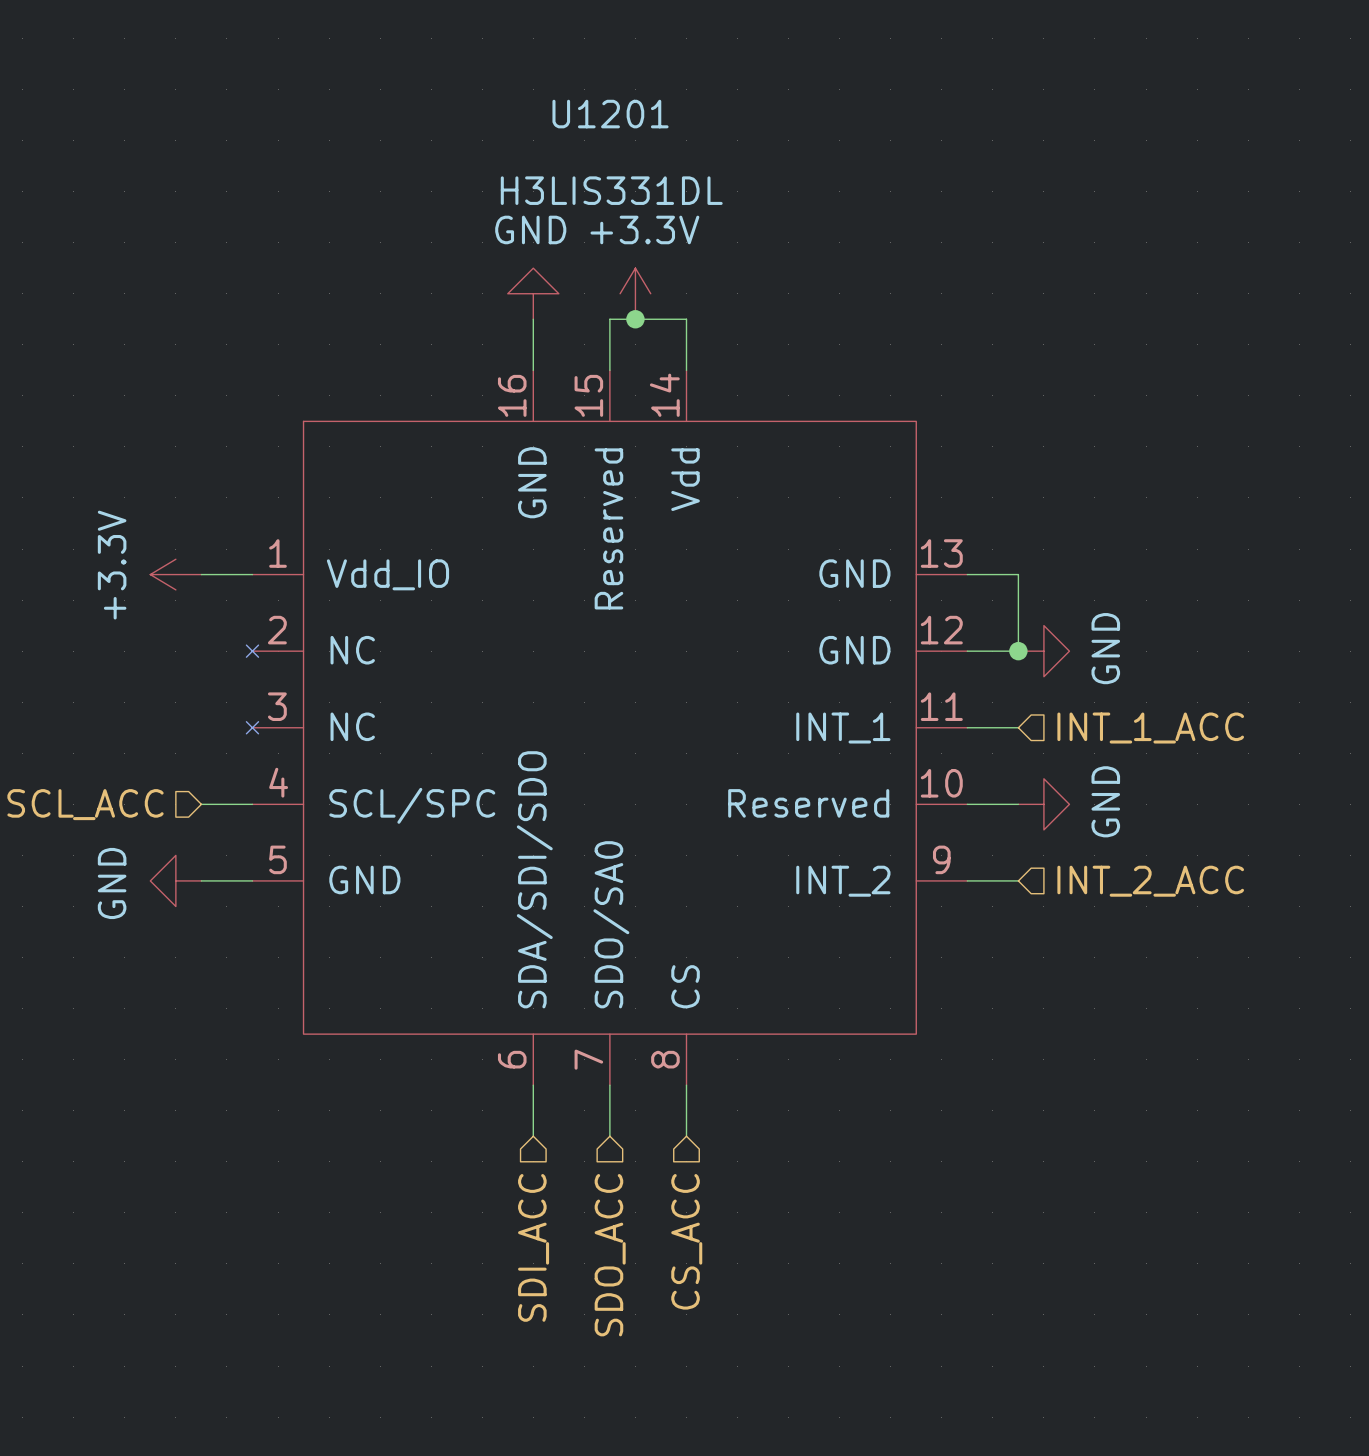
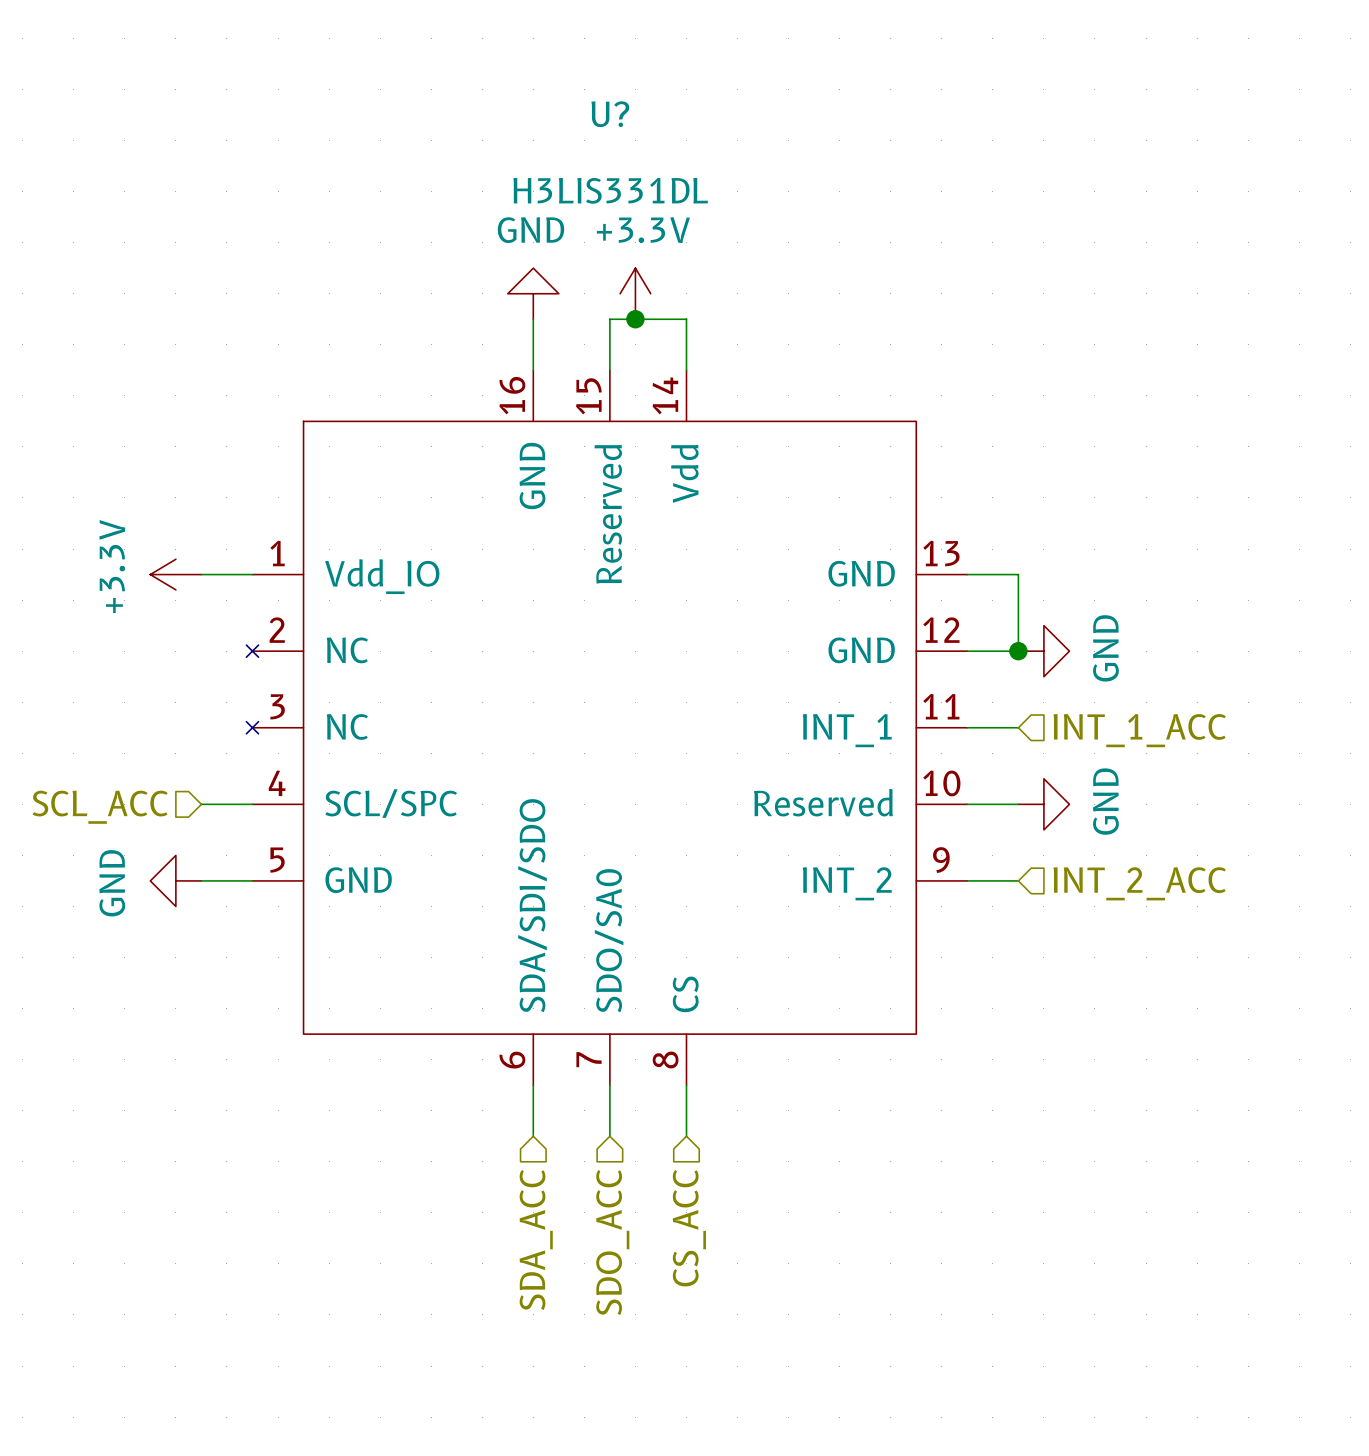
U1201 name: U1201 (610, 114) -> U? (610, 114)
hierarchical label: SDI_ACC (533, 1247) -> SDA_ACC (536, 1240)

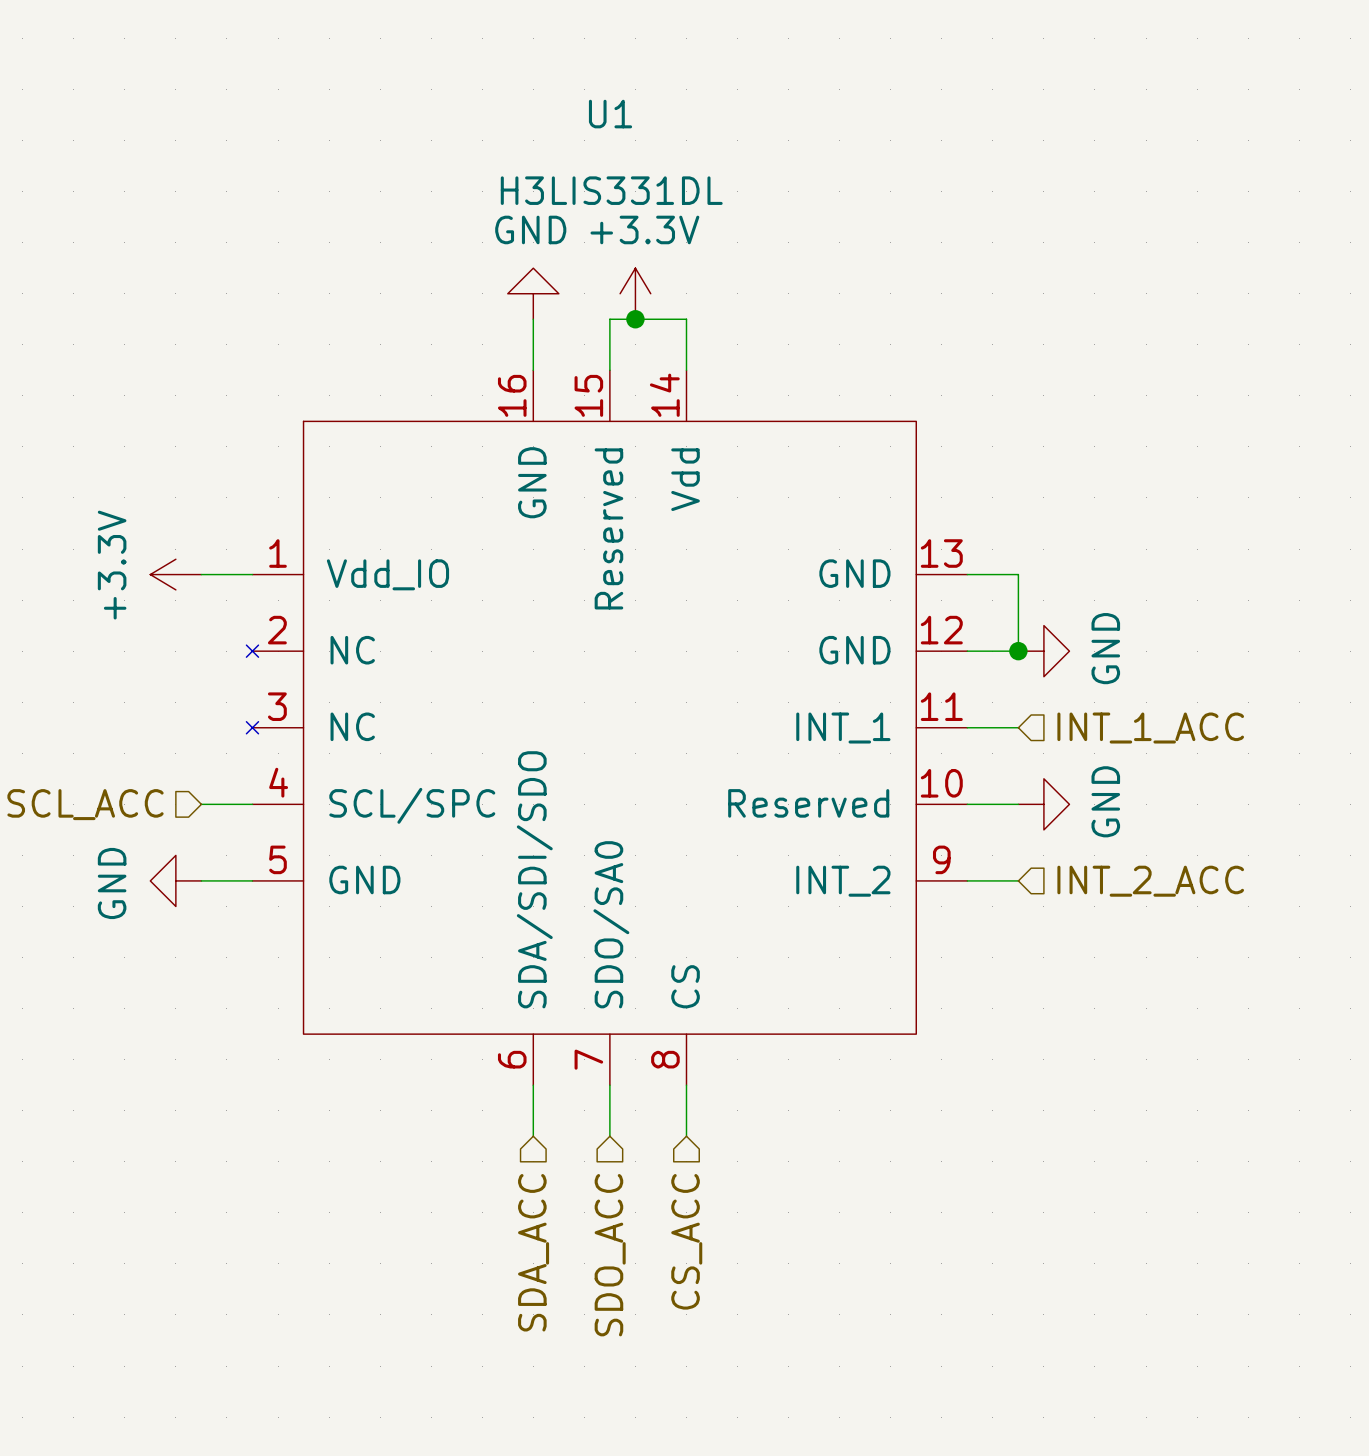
U? name: U? (610, 114) -> U1 (610, 114)

